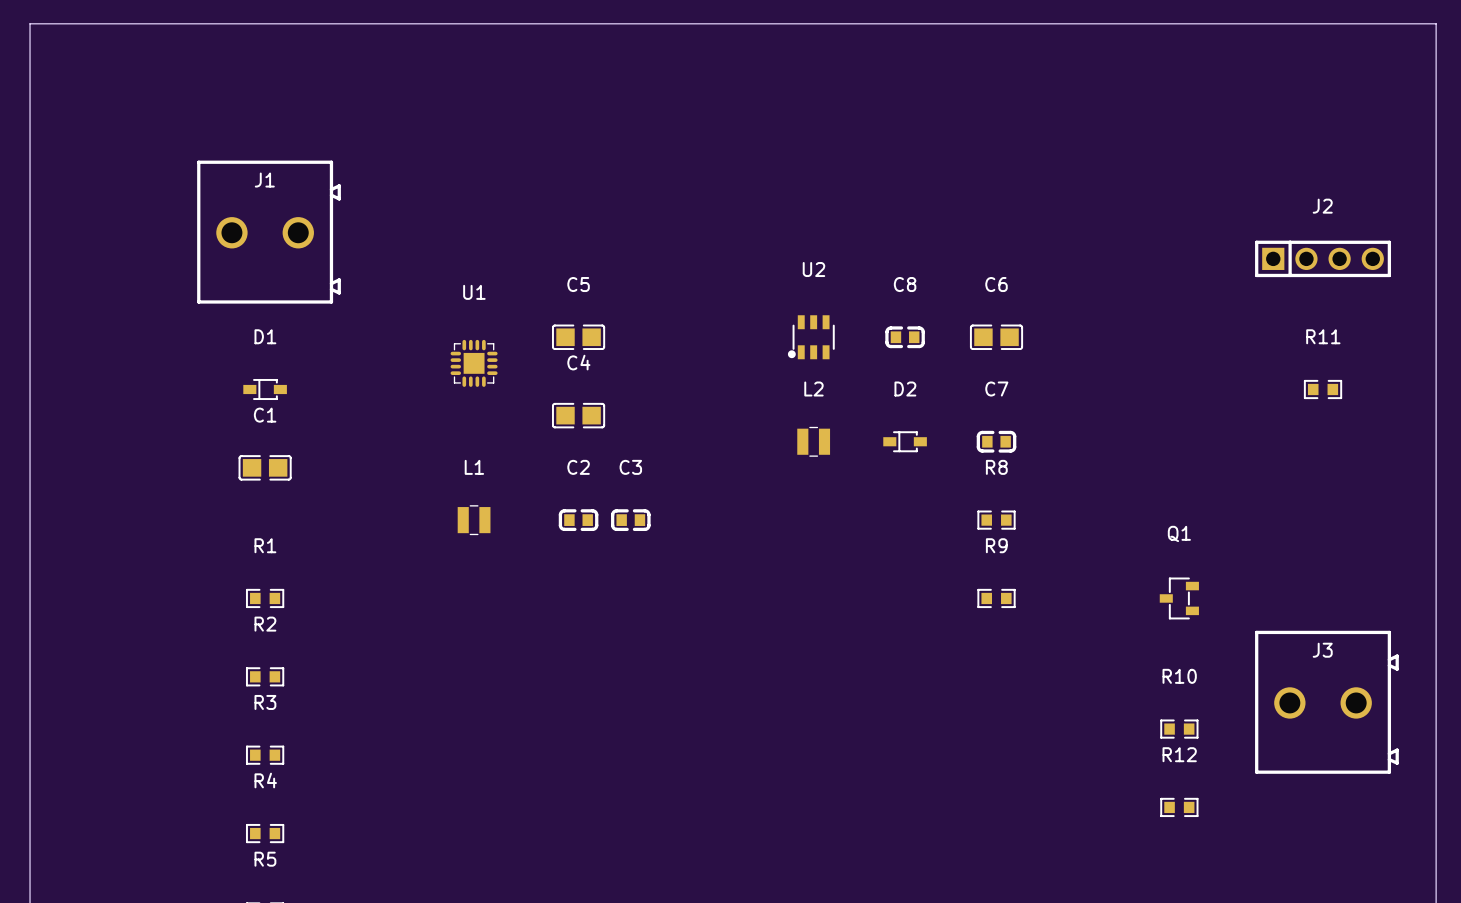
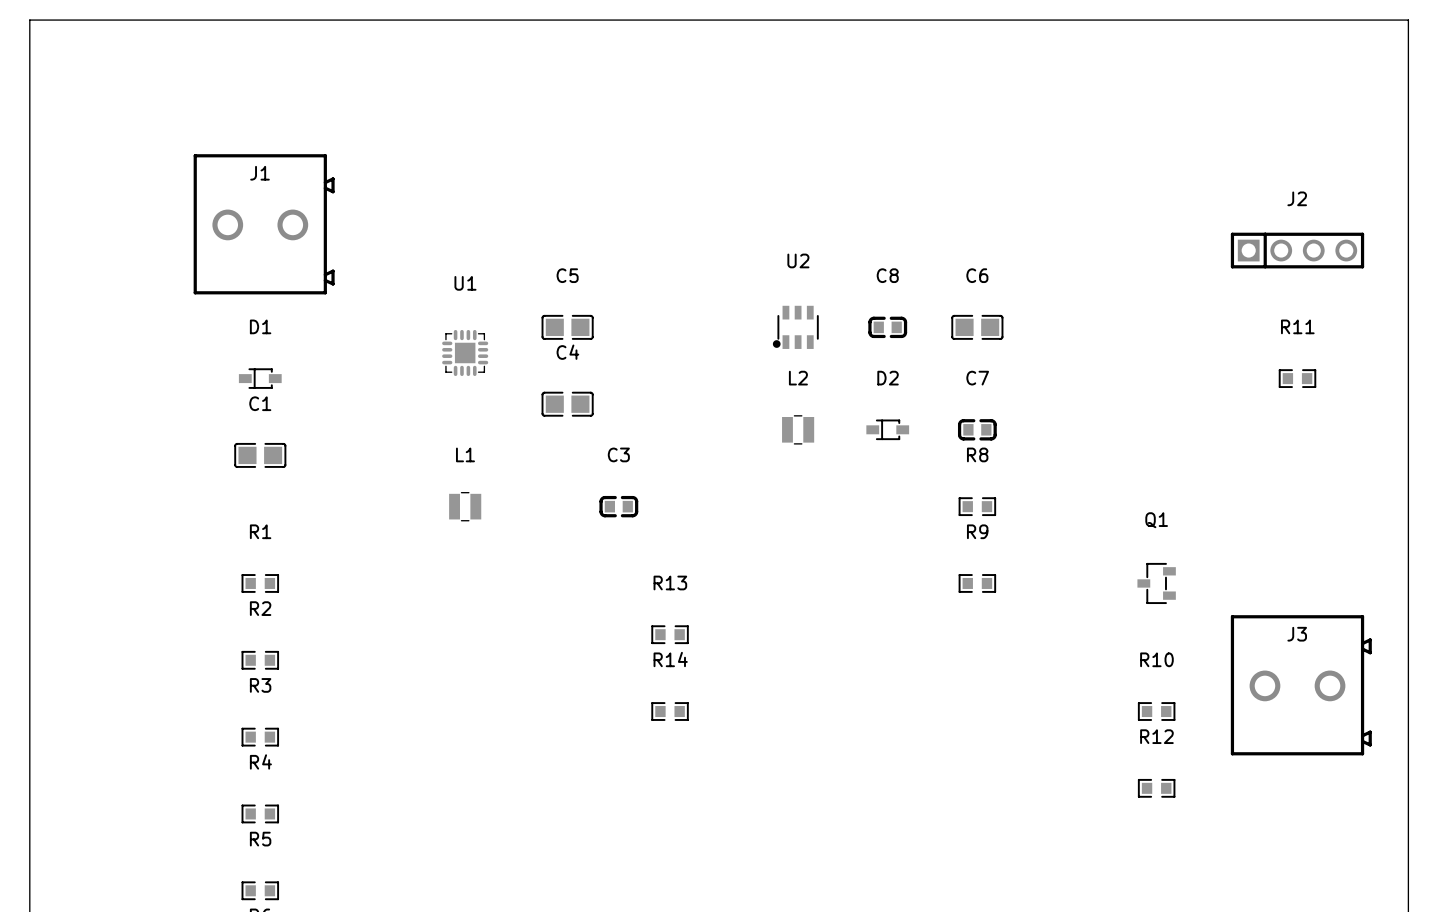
C2: (578, 520) -> none
R13: none -> (670, 634)
R14: none -> (670, 711)

